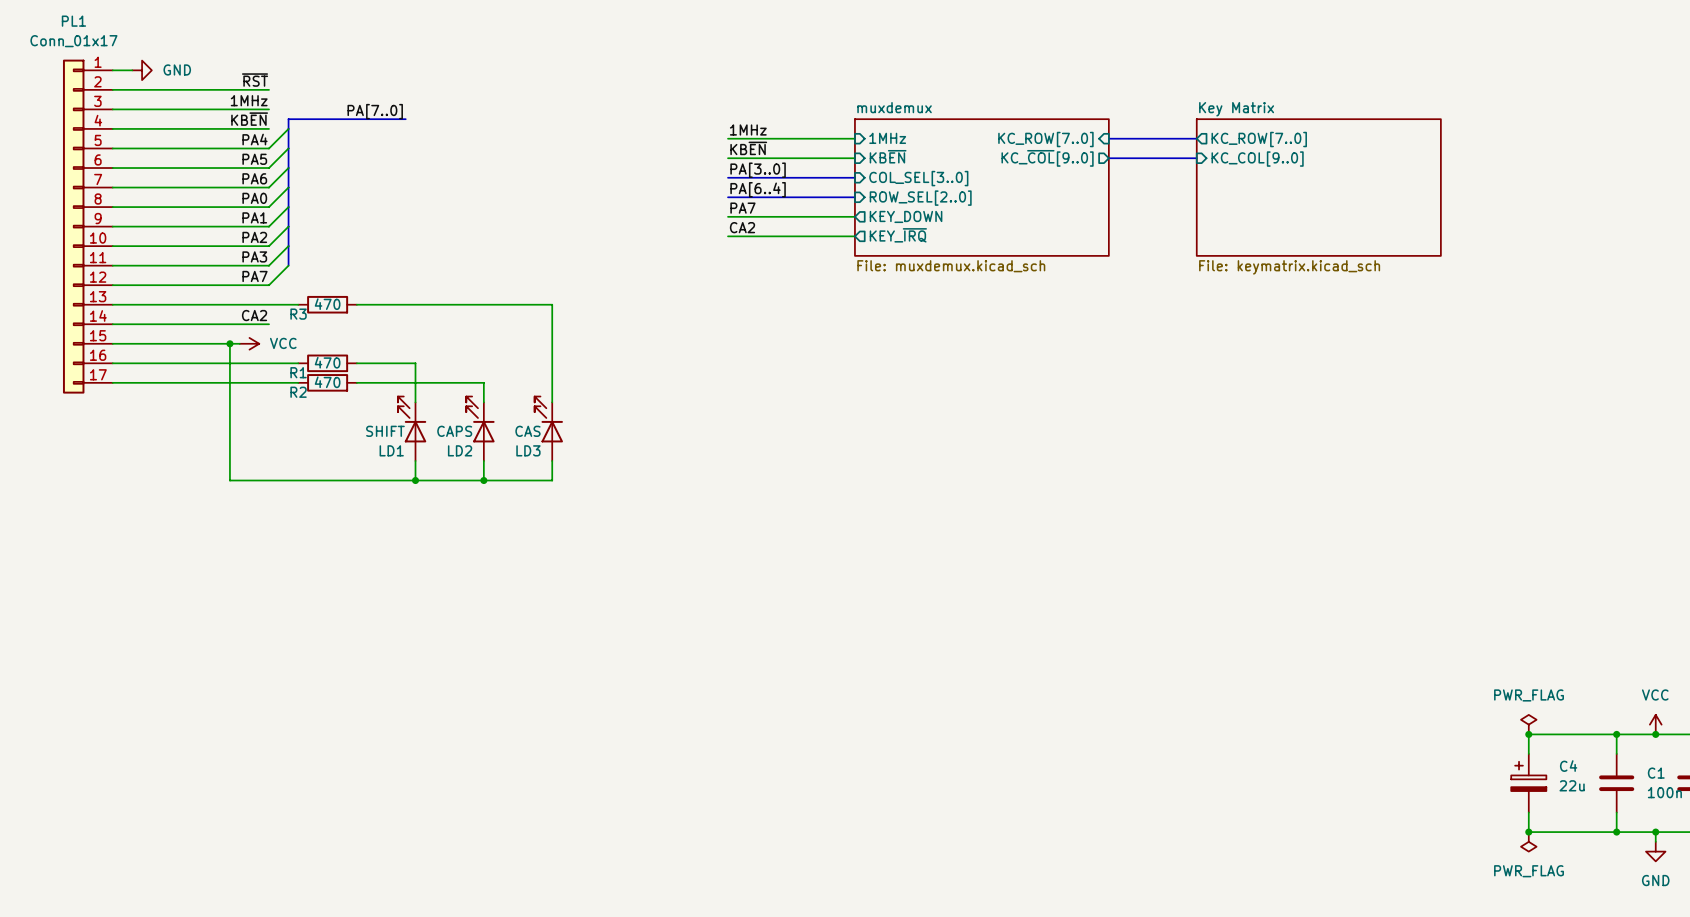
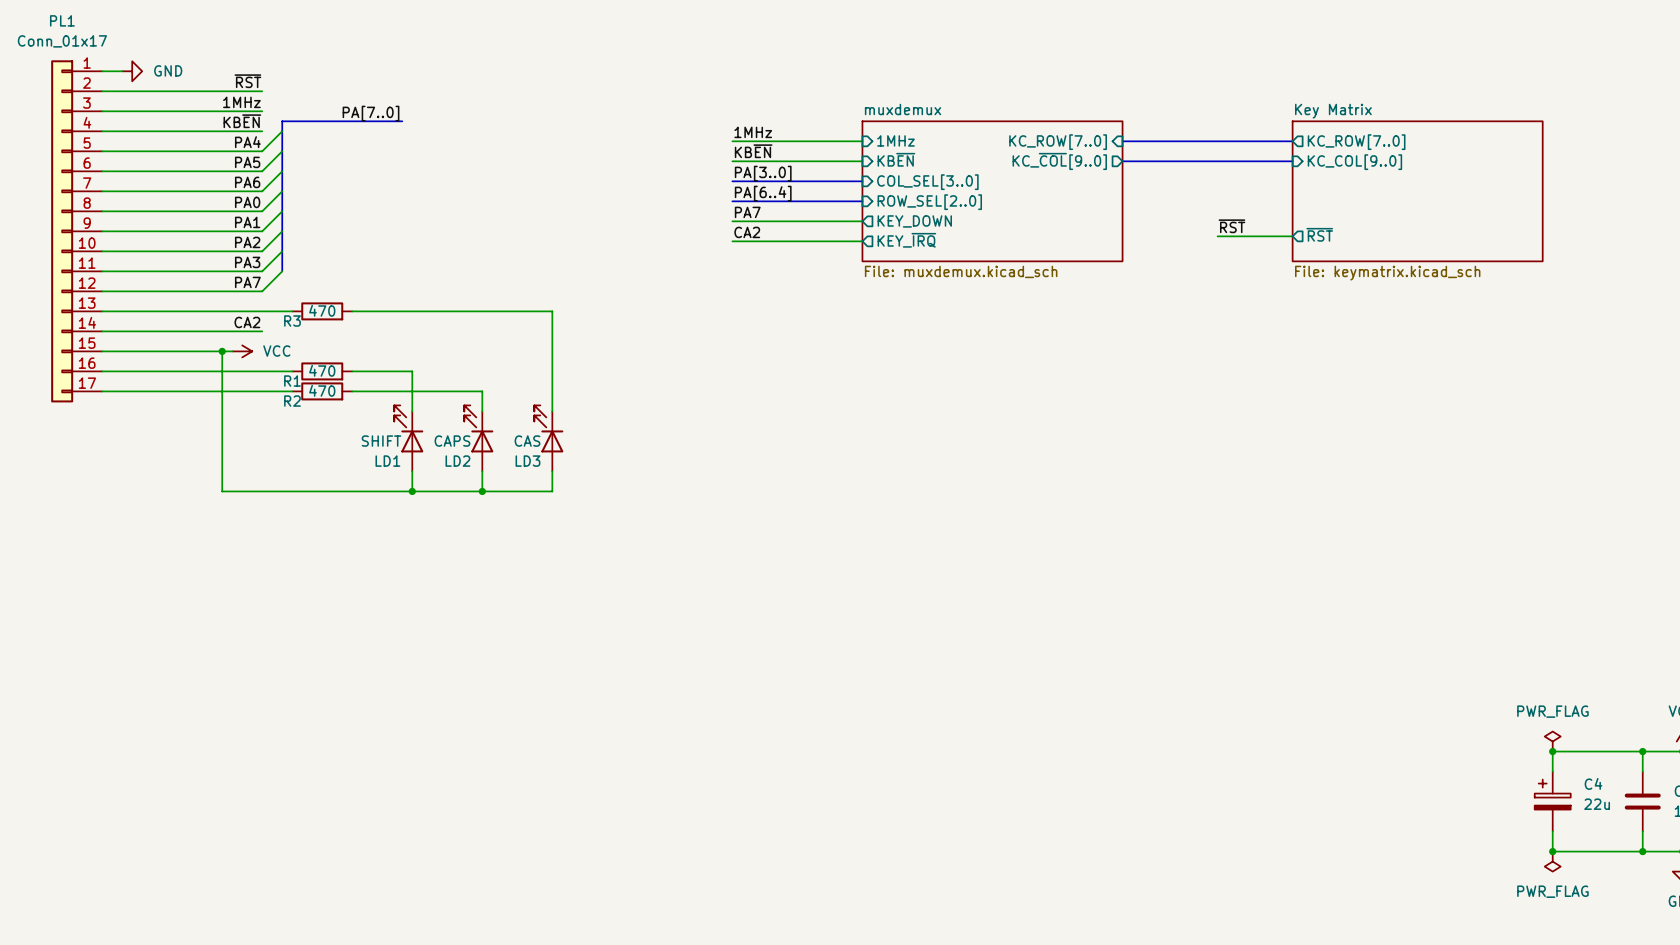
bus: none -> (1212, 141) (1292, 141)
sheet pin position: KC_ROW[7..0] (1259, 139) -> KC_ROW[7..0] (1356, 142)
bus: none -> (1212, 161) (1292, 161)
sheet pin position: KC_COL[9..0] (1257, 159) -> KC_COL[9..0] (1354, 162)
sheet Key Matrix position: (1318, 187) -> (1417, 191)
label: none -> ~{RST} (1231, 226)
sheet pin: none -> ~{RST} (1319, 234)
wire: none -> (1217, 236) (1292, 236)

